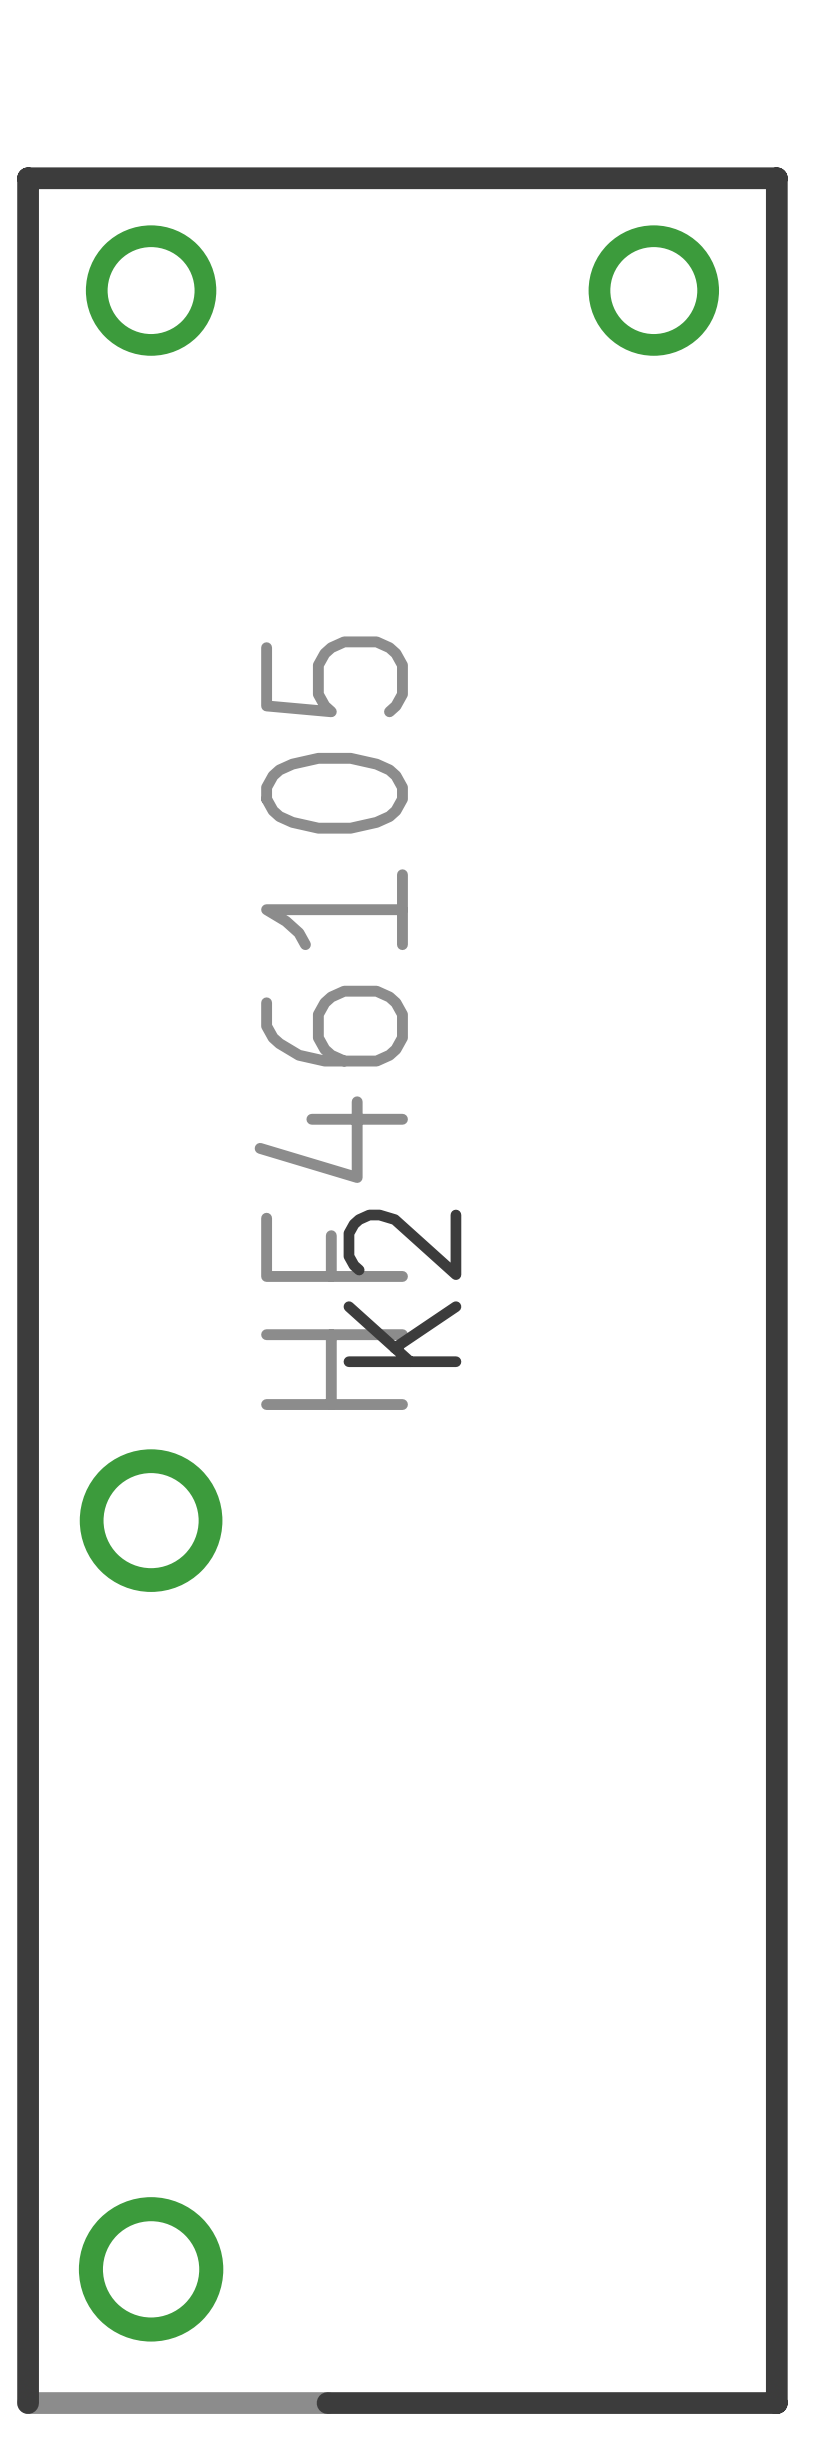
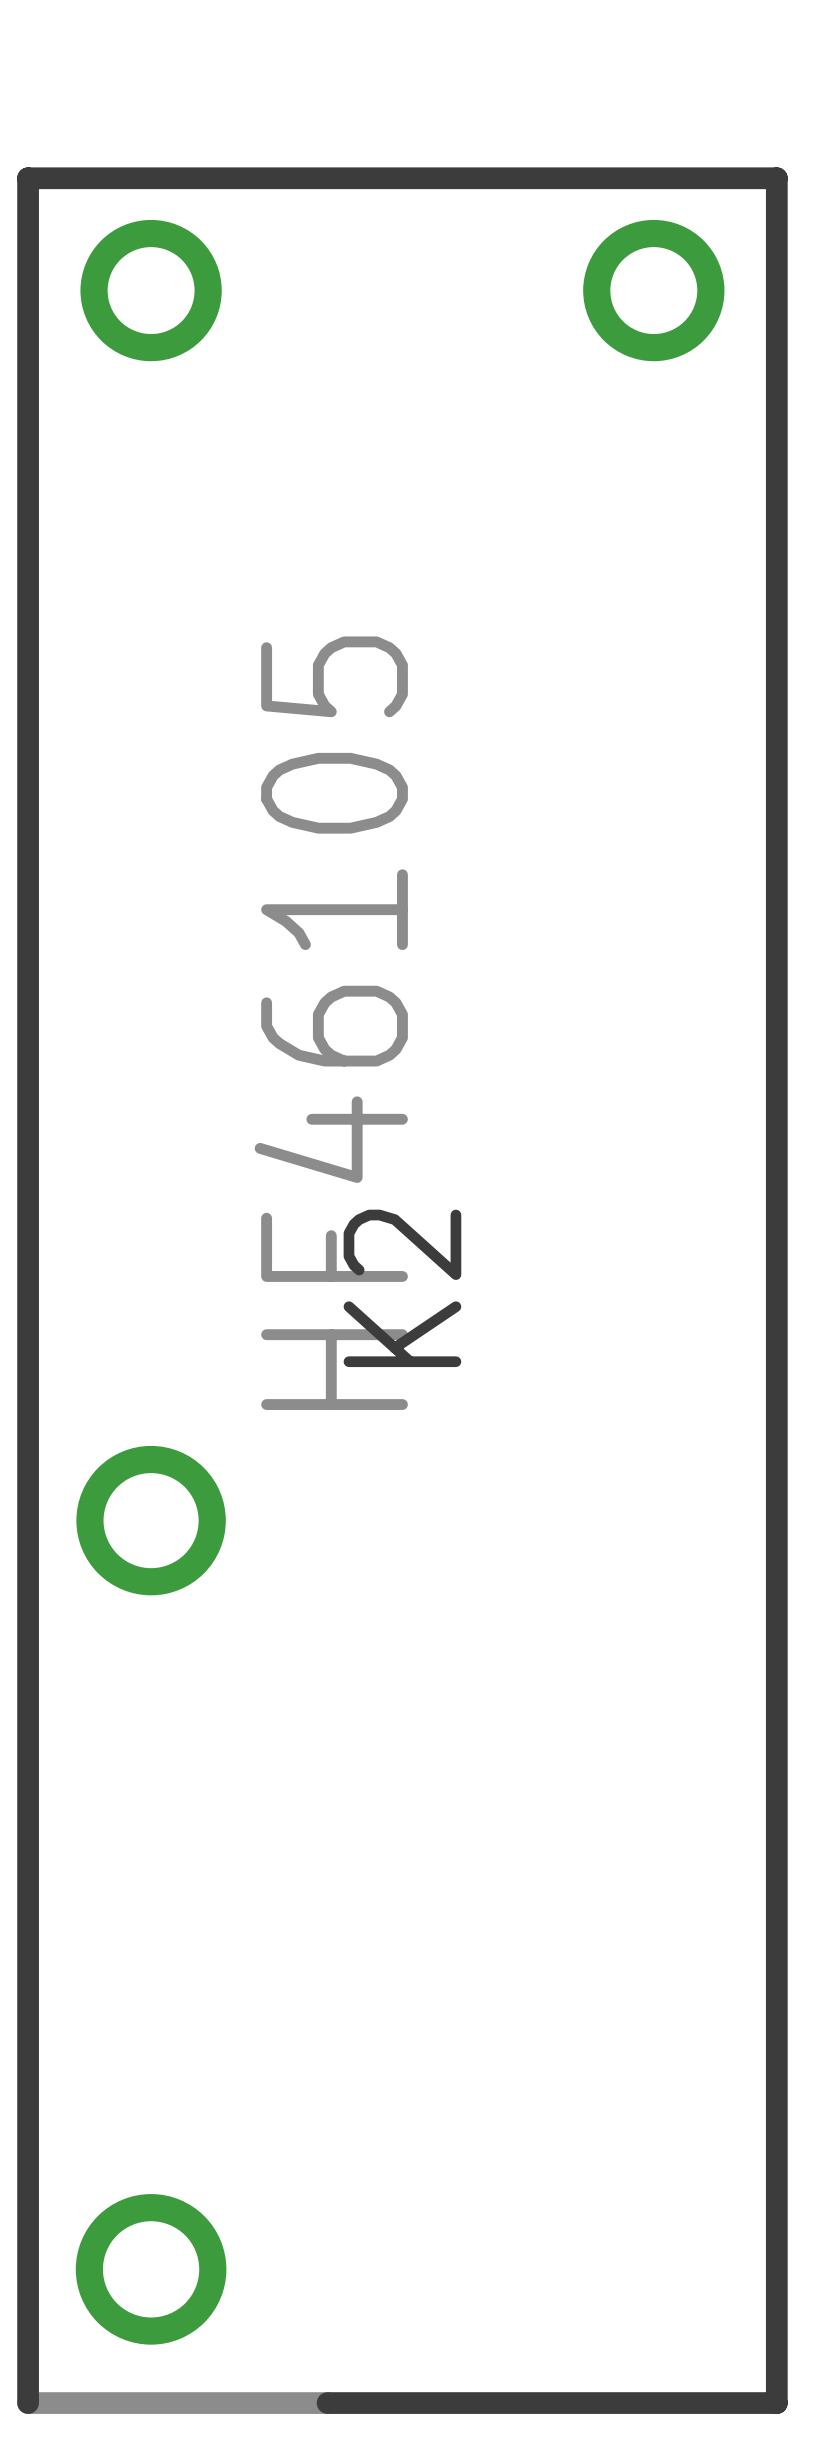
K2 footprint: [17, 167, 788, 2414] -> [17, 167, 788, 2414]

